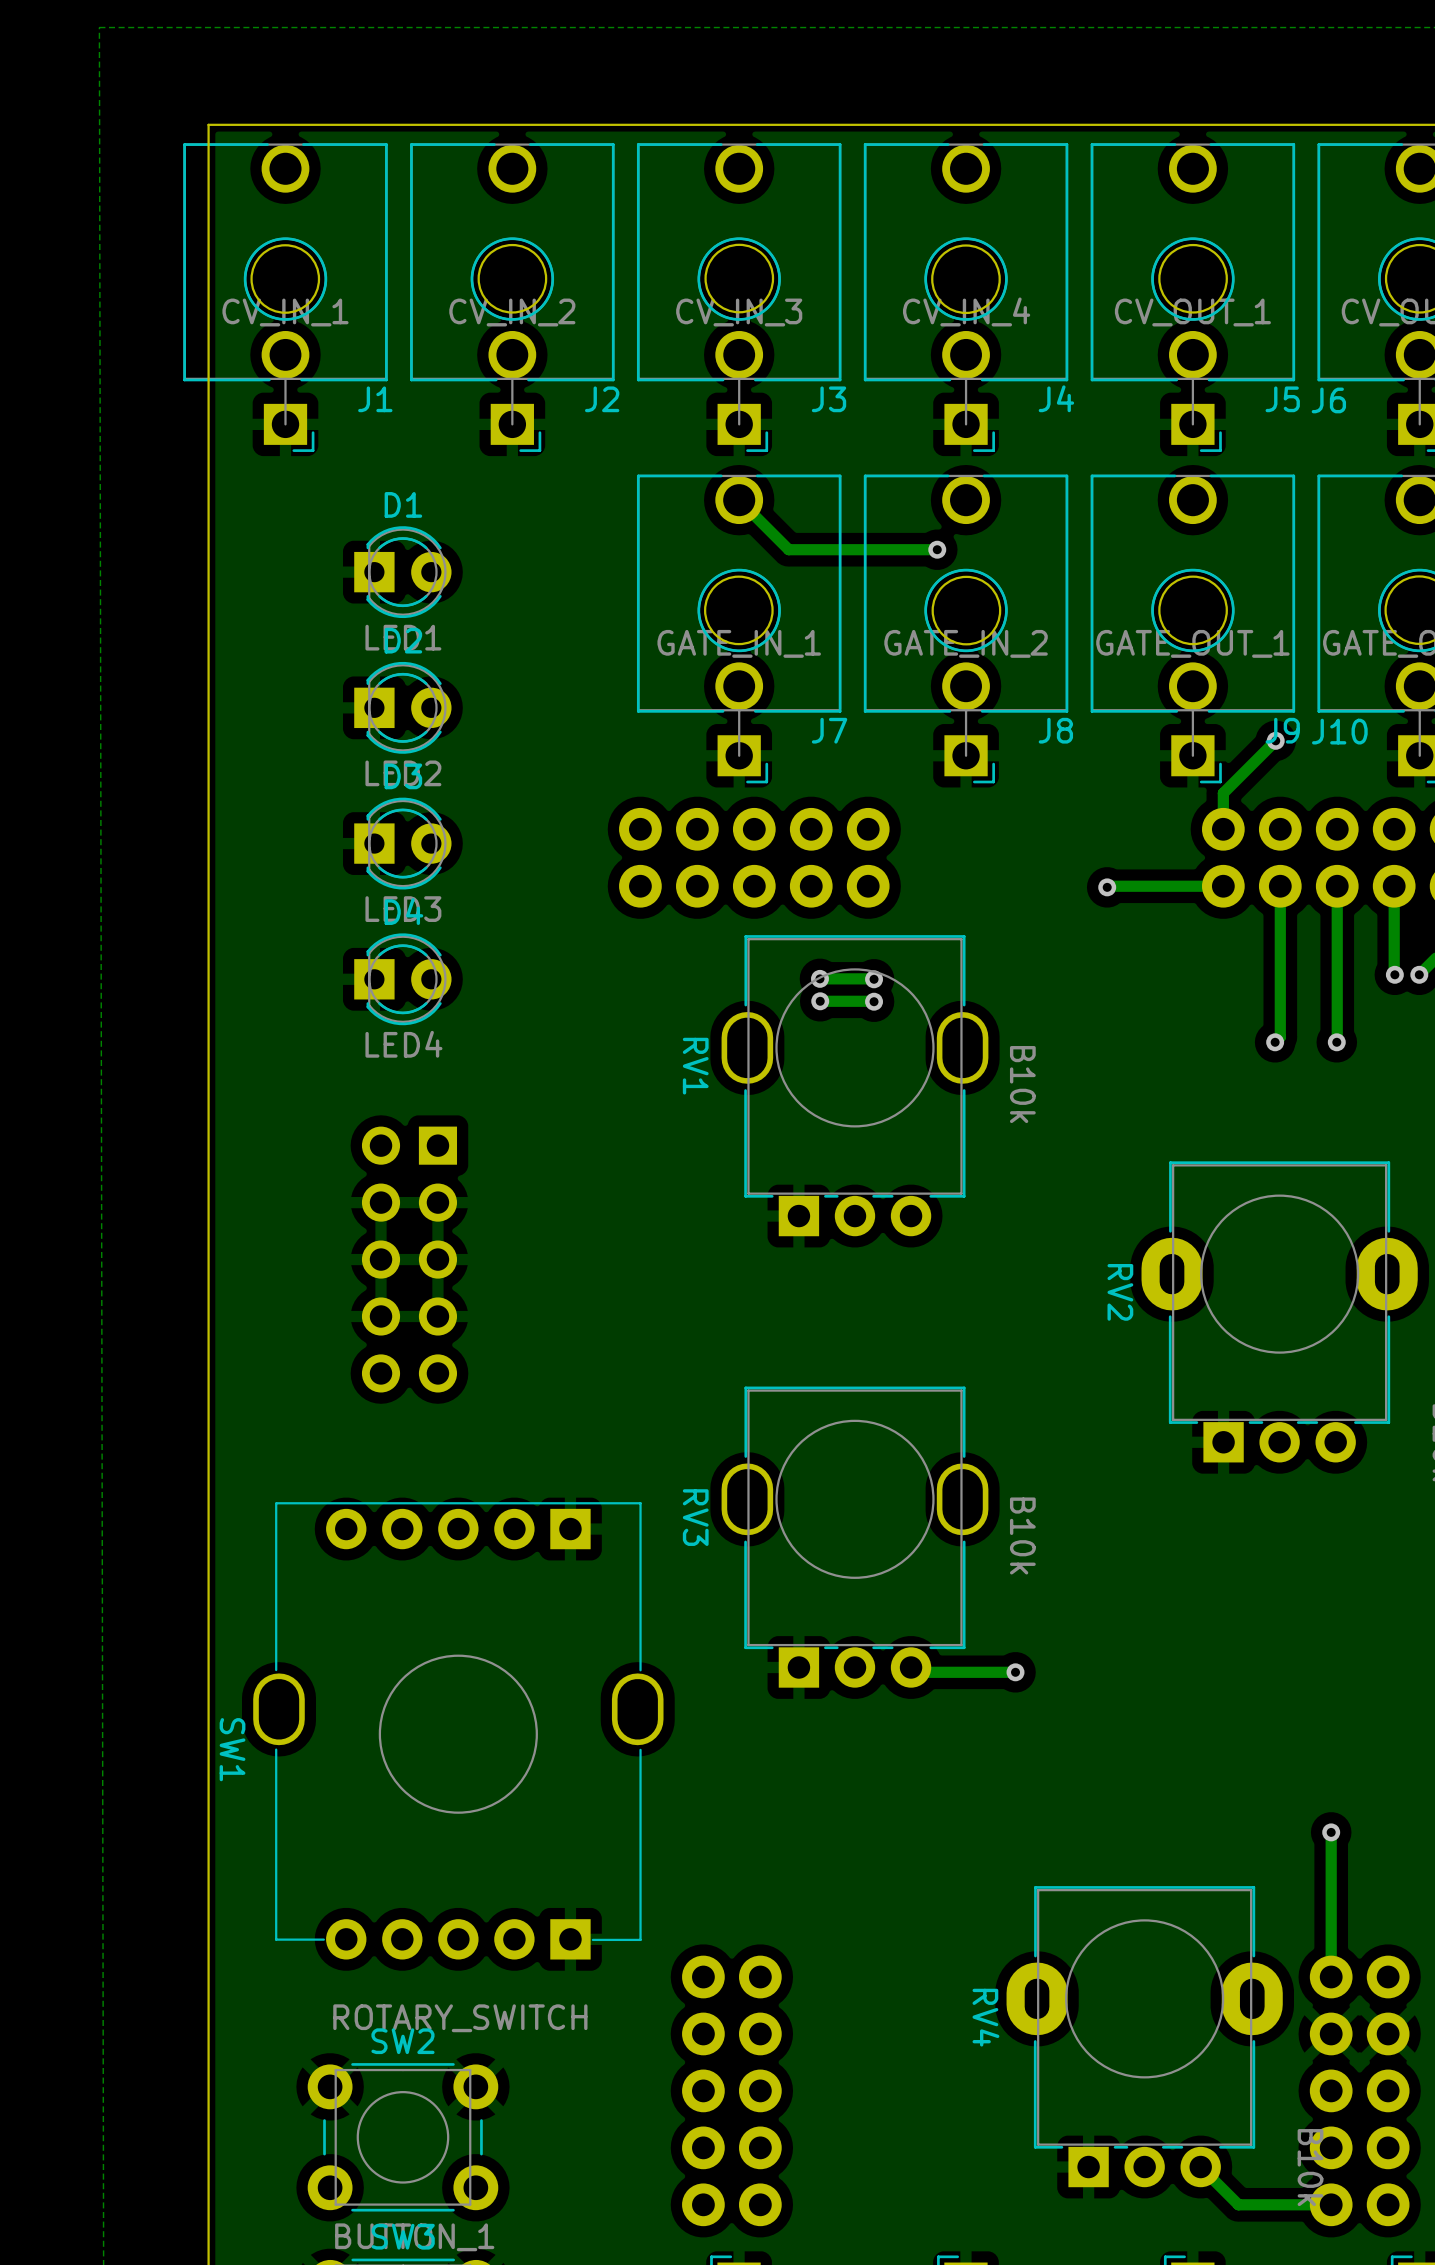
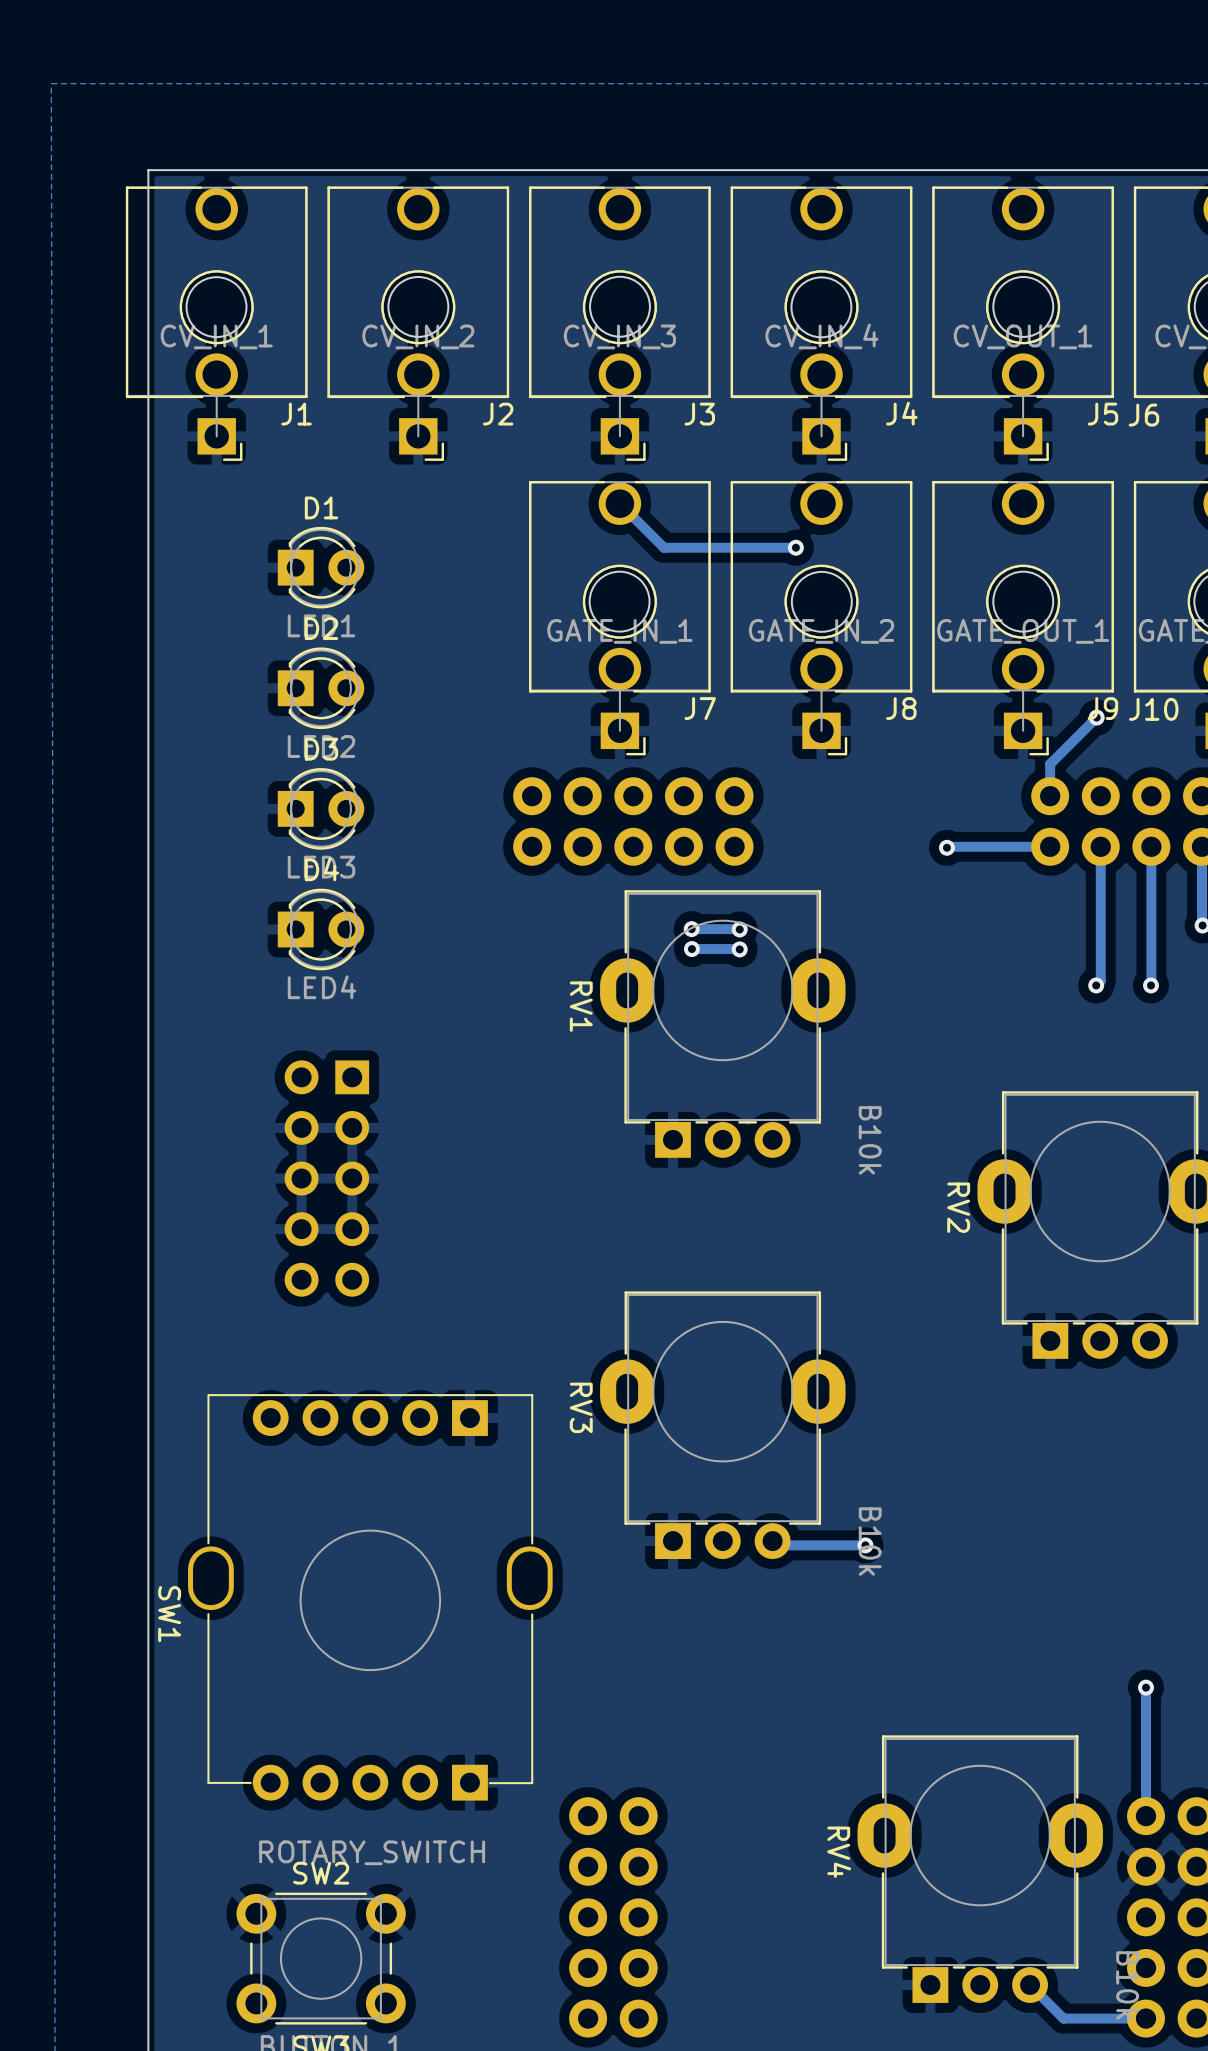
RV1 footprint: [721, 935, 989, 1237] -> [600, 890, 846, 1158]
RV1 value position: B10k (1022, 1084) -> B10k (870, 1140)
RV3 footprint: [721, 1386, 989, 1688] -> [600, 1291, 846, 1560]
RV3 value position: B10k (1022, 1535) -> B10k (870, 1541)

